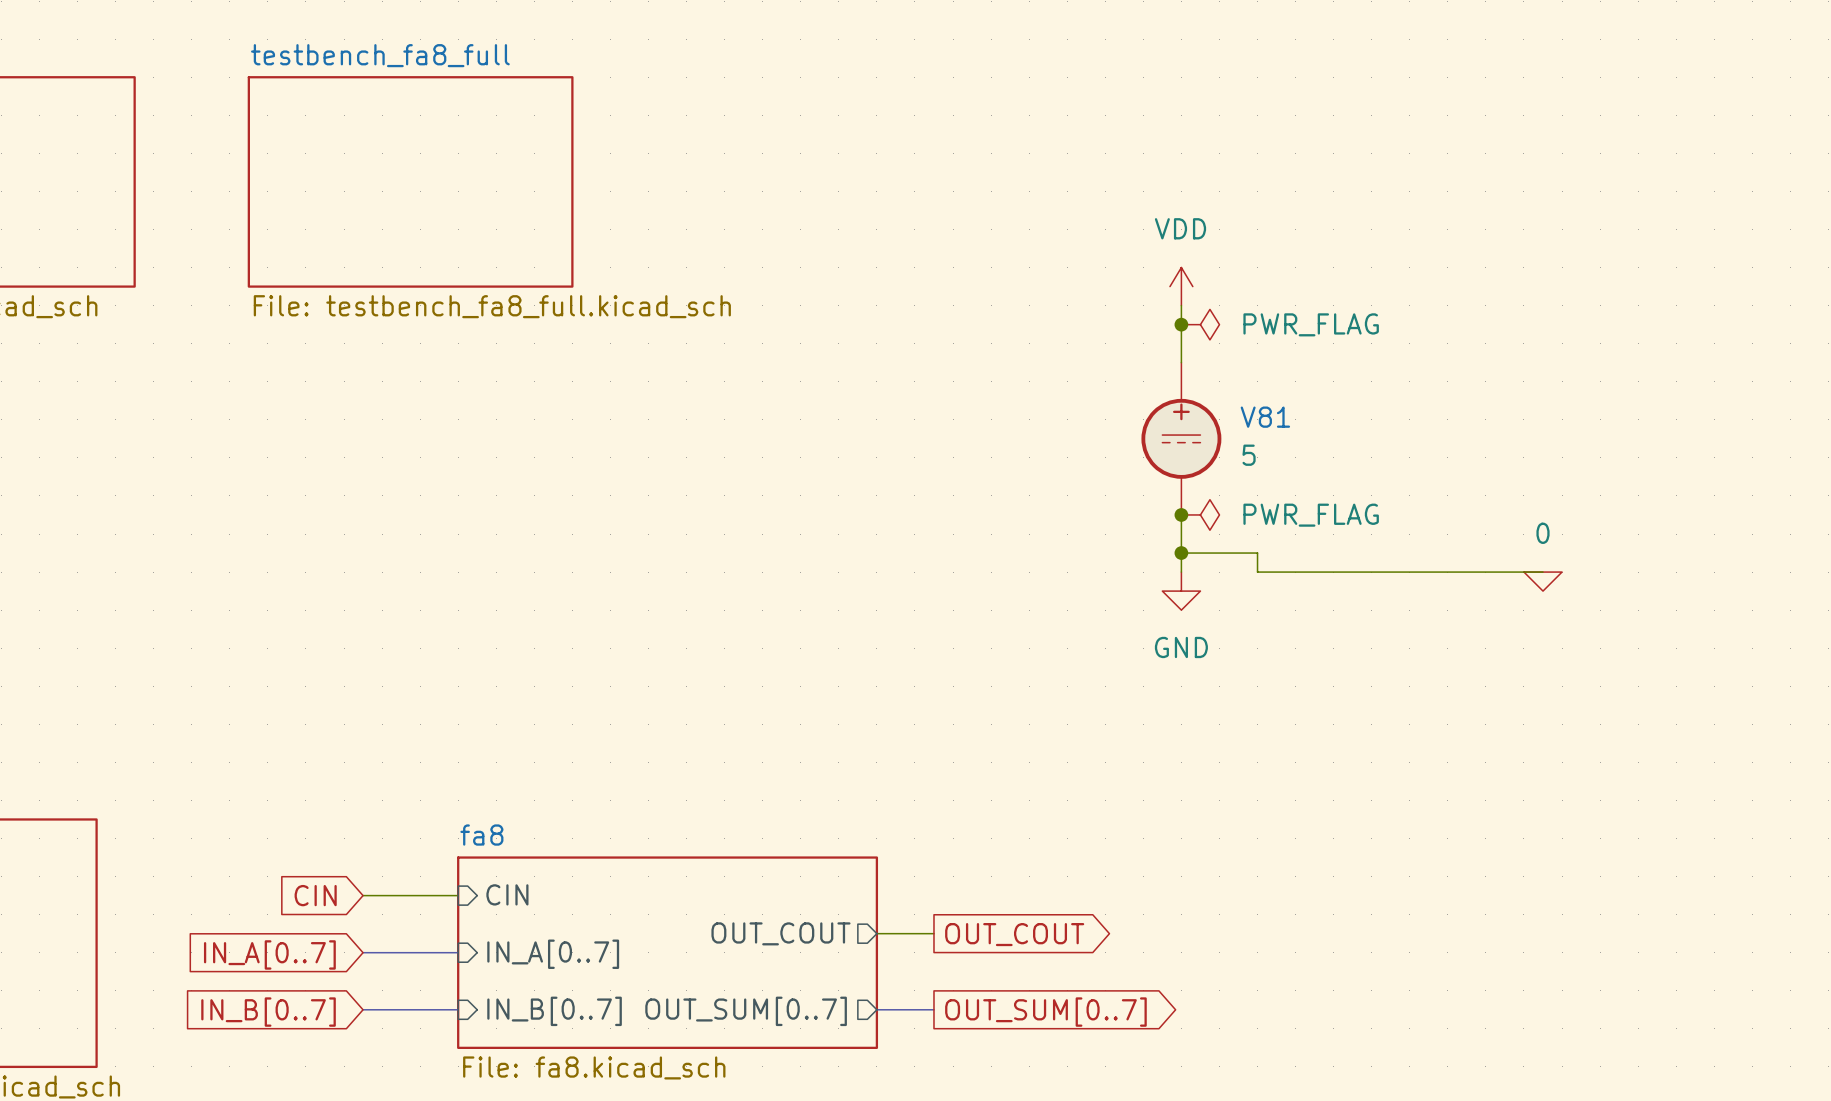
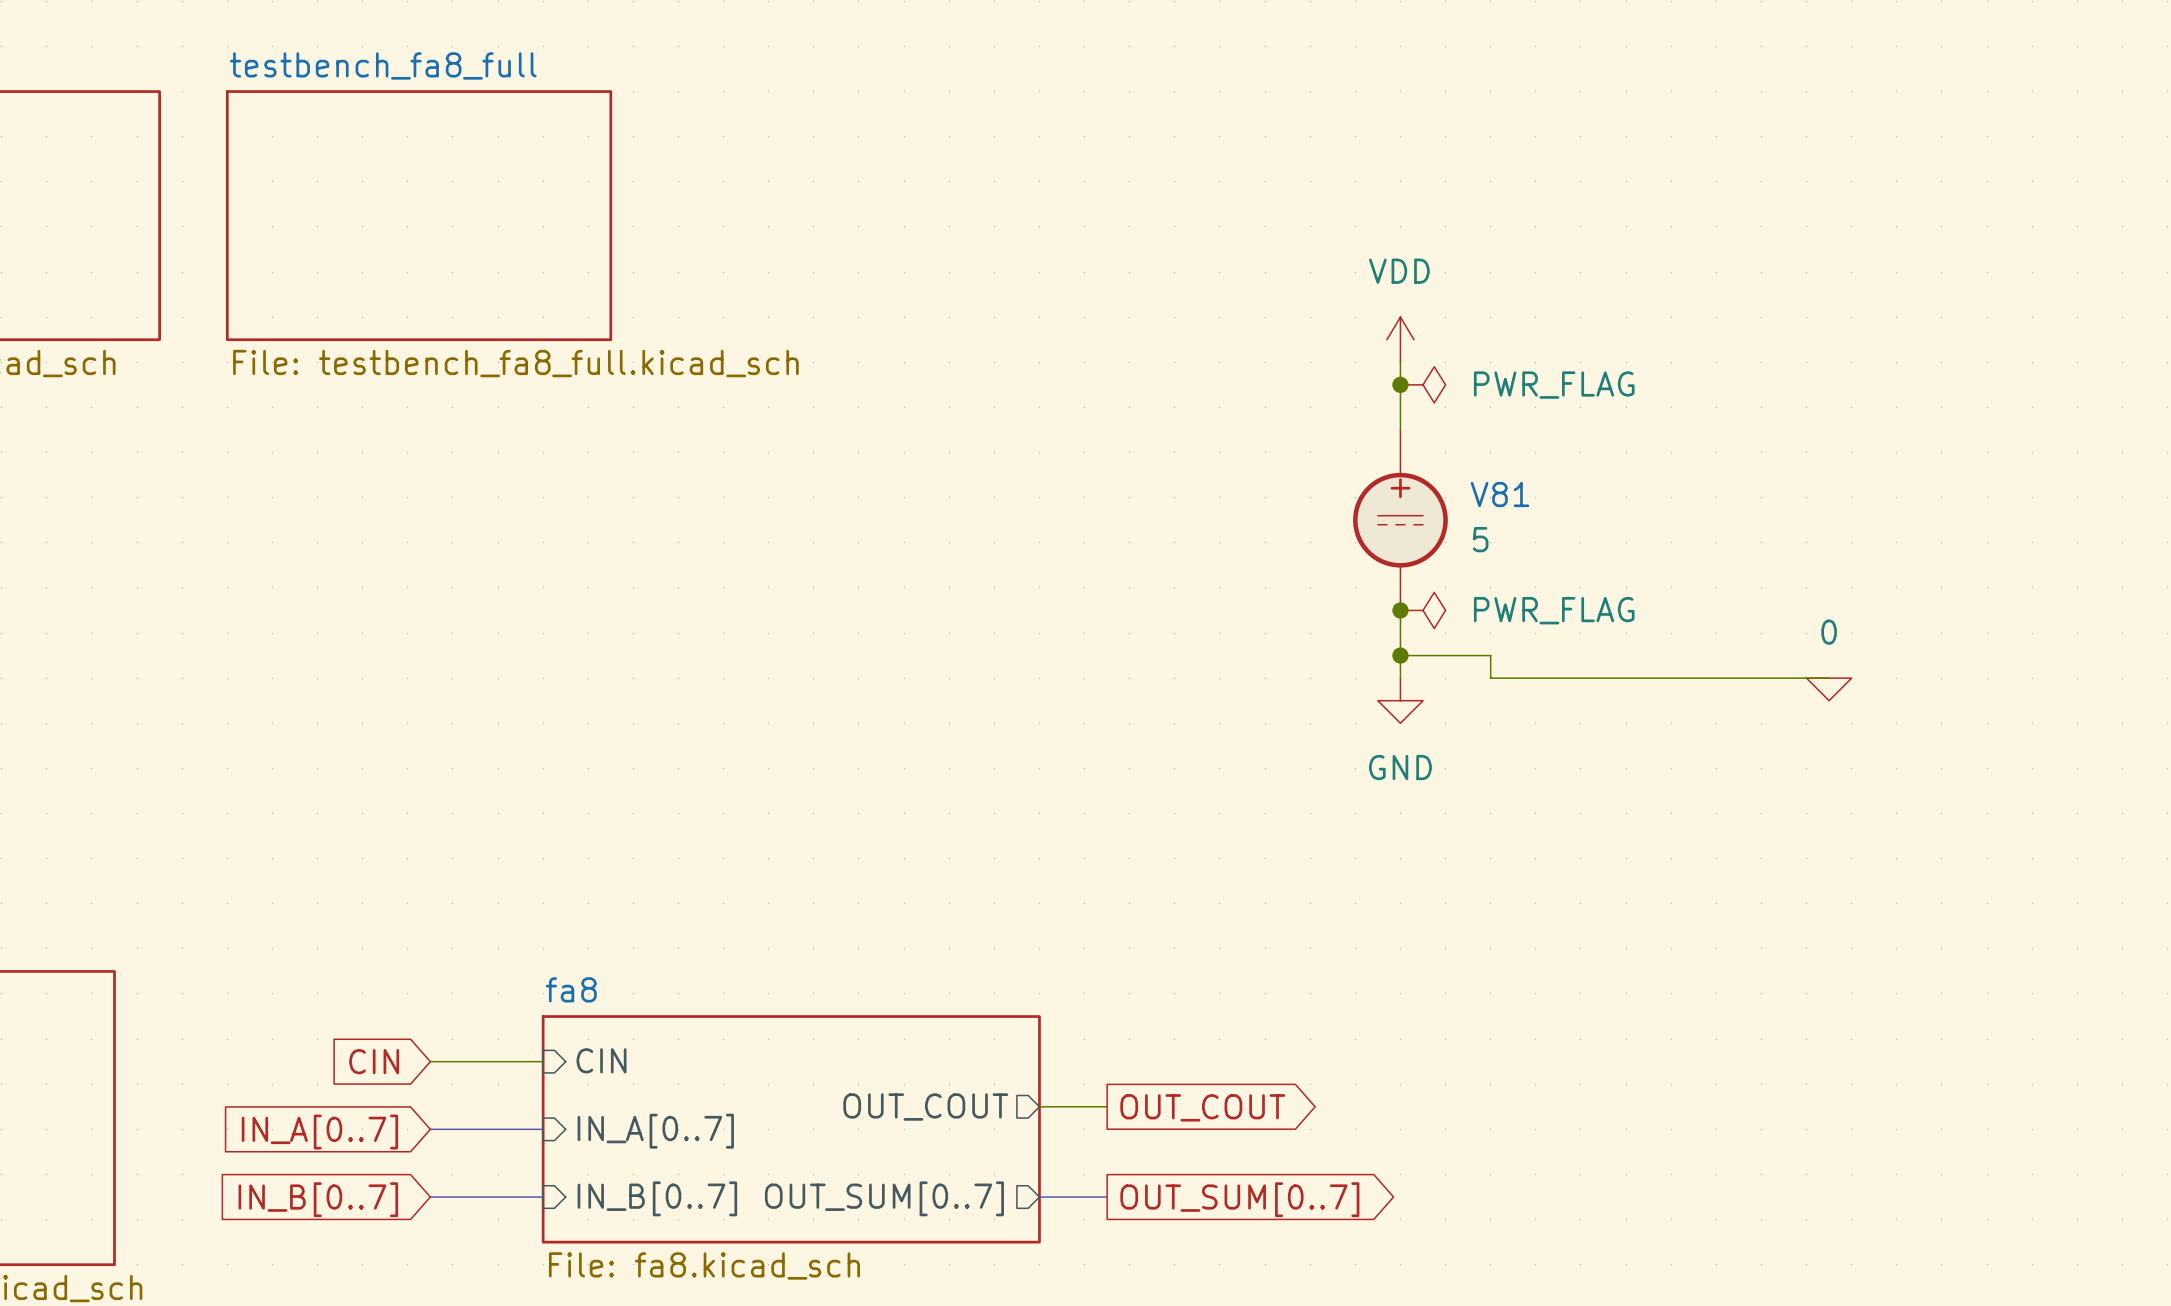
sheet testbench_fa8_full position: (410, 181) -> (419, 215)

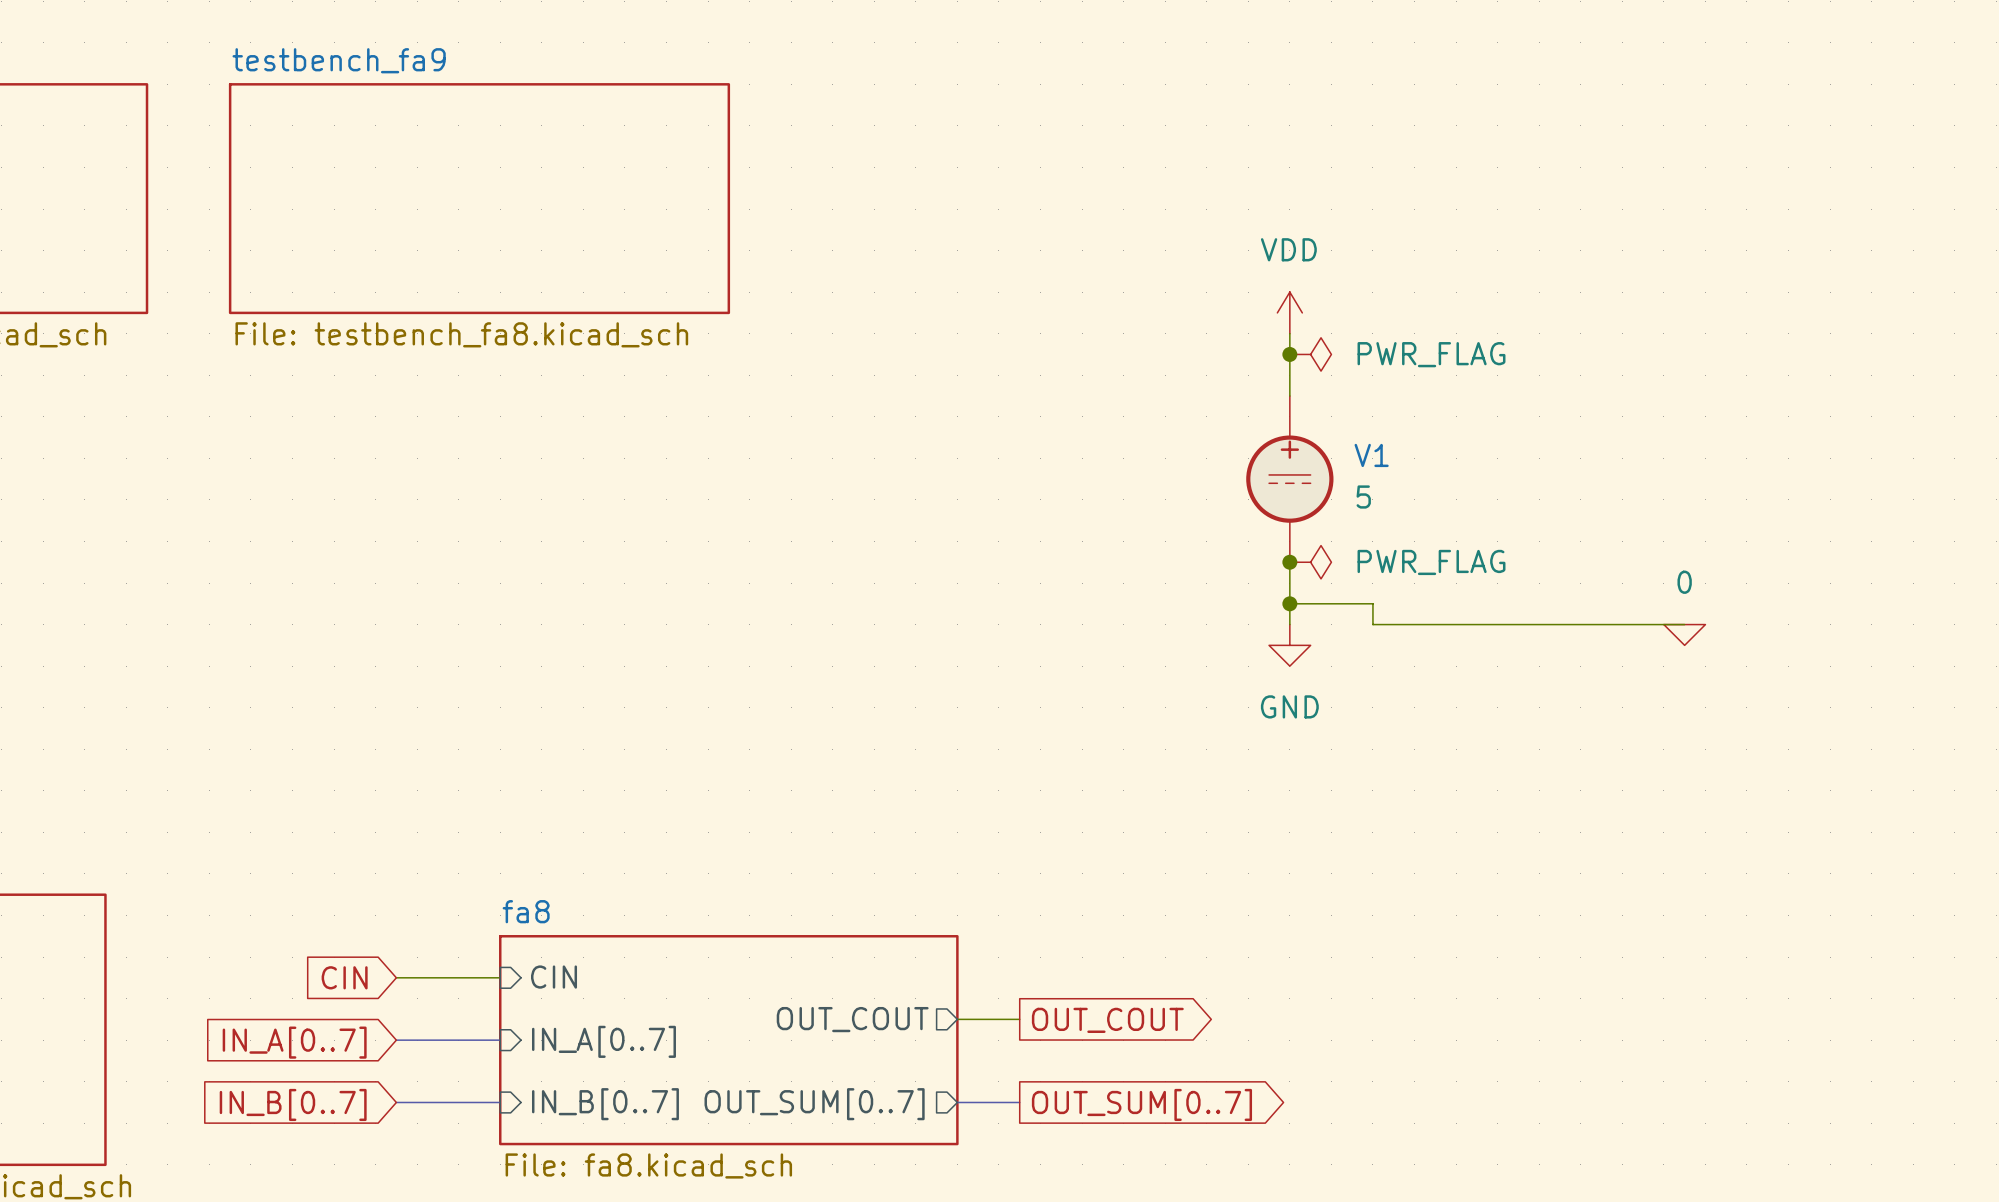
sheet testbench_fa8_full: File: testbench_fa8_full.kicad_sch (419, 215) -> none
sheet testbench_fa9: none -> File: testbench_fa8.kicad_sch (479, 198)
V81 name: V81 (1499, 494) -> V1 (1371, 455)

